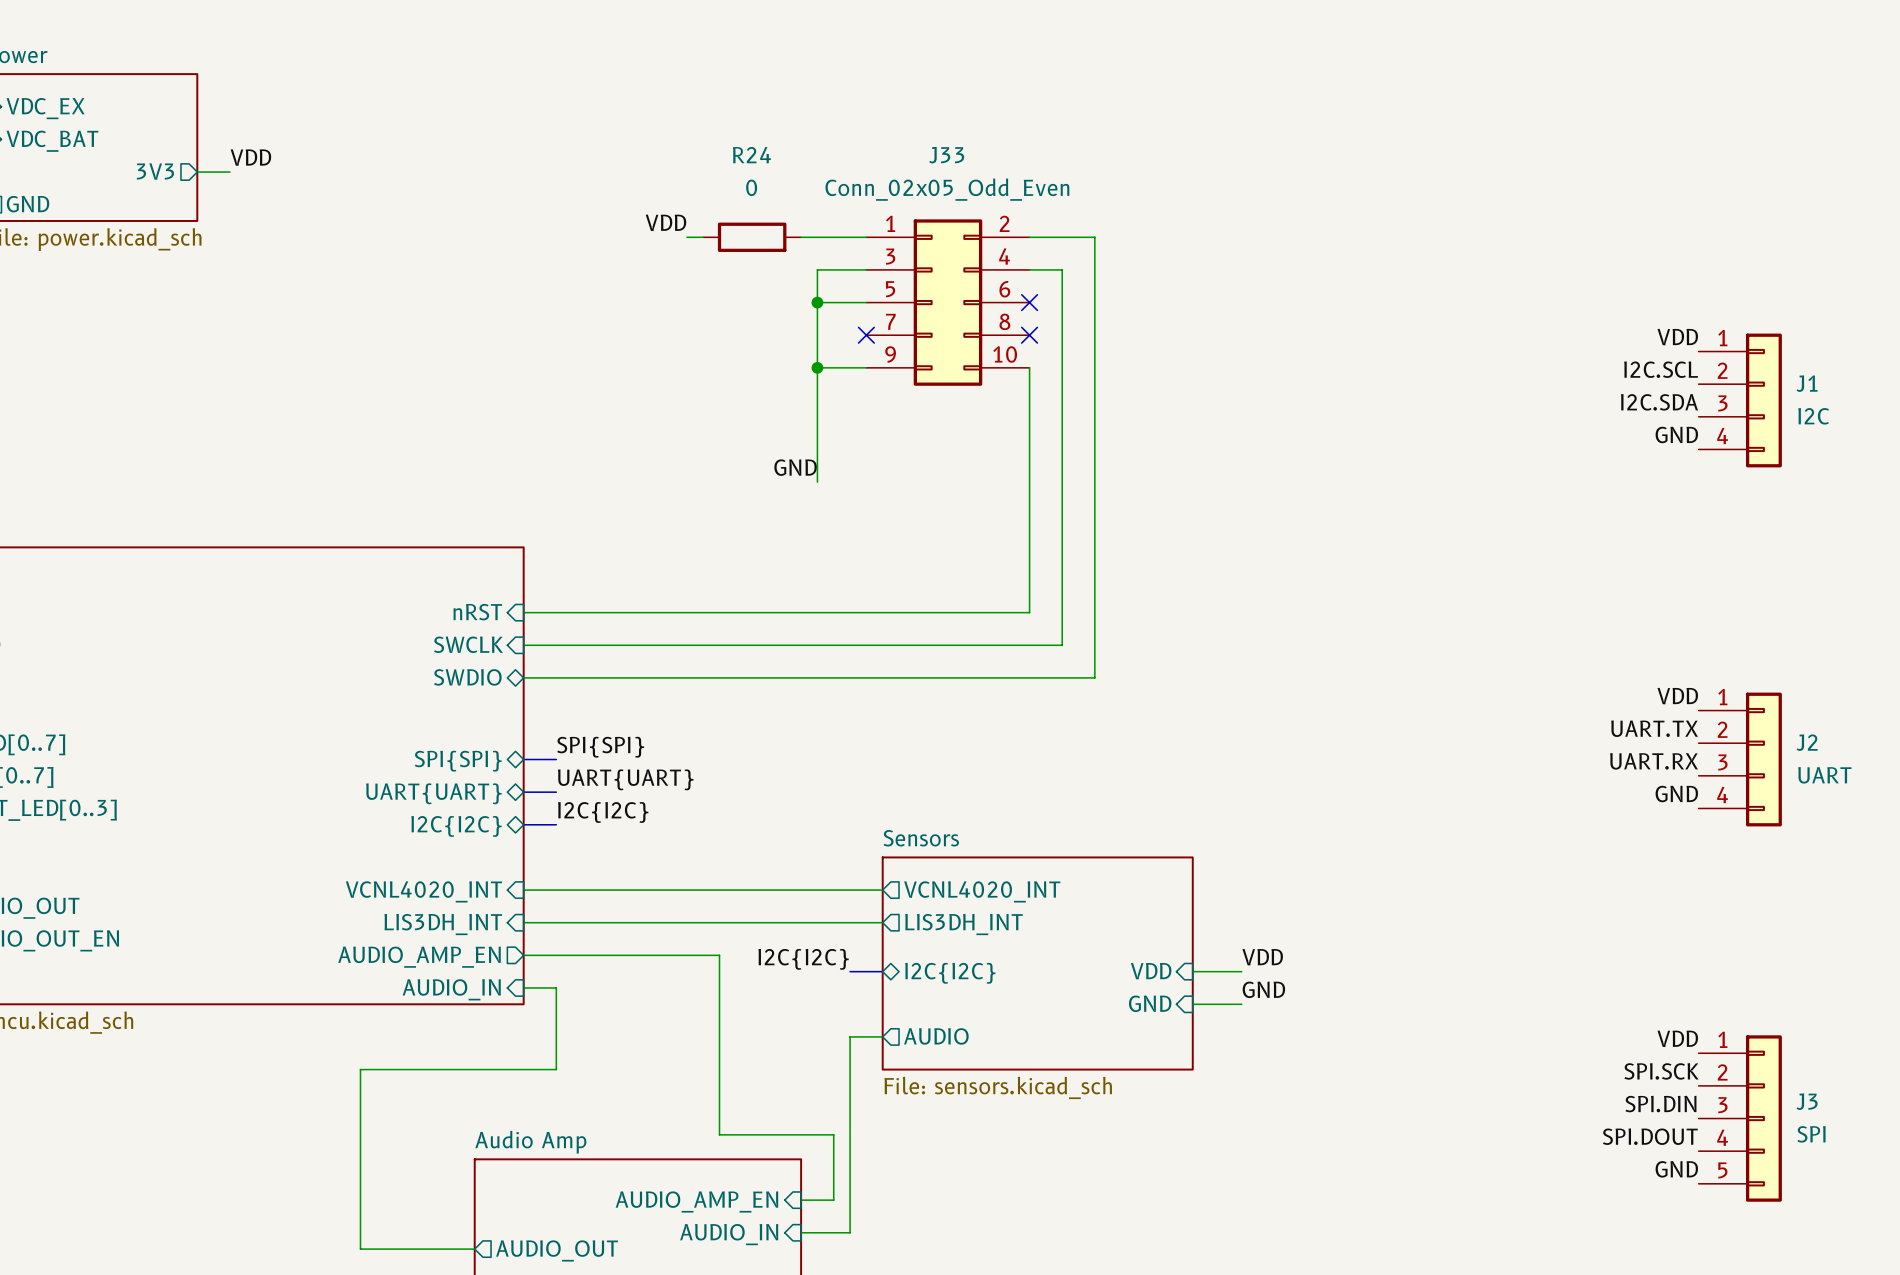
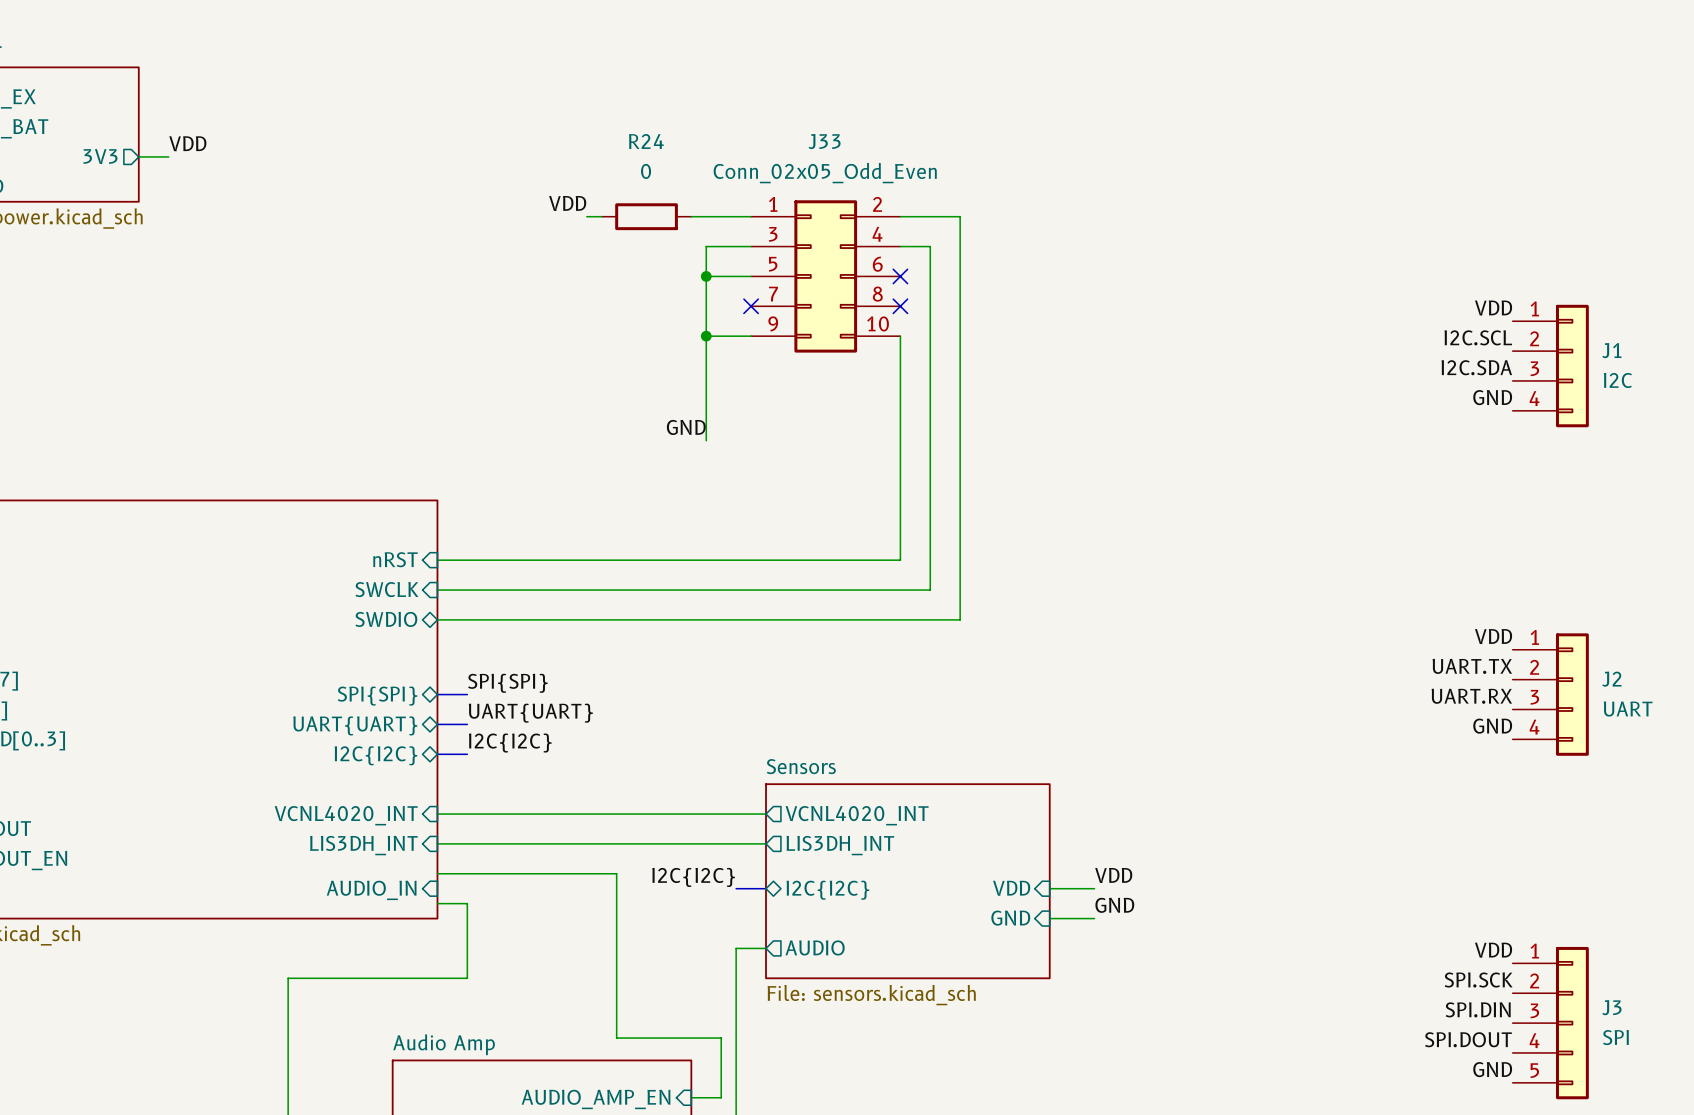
sheet pin: AUDIO_AMP_EN (419, 957) -> none
sheet pin position: AUDIO_IN (451, 989) -> AUDIO_IN (371, 890)

